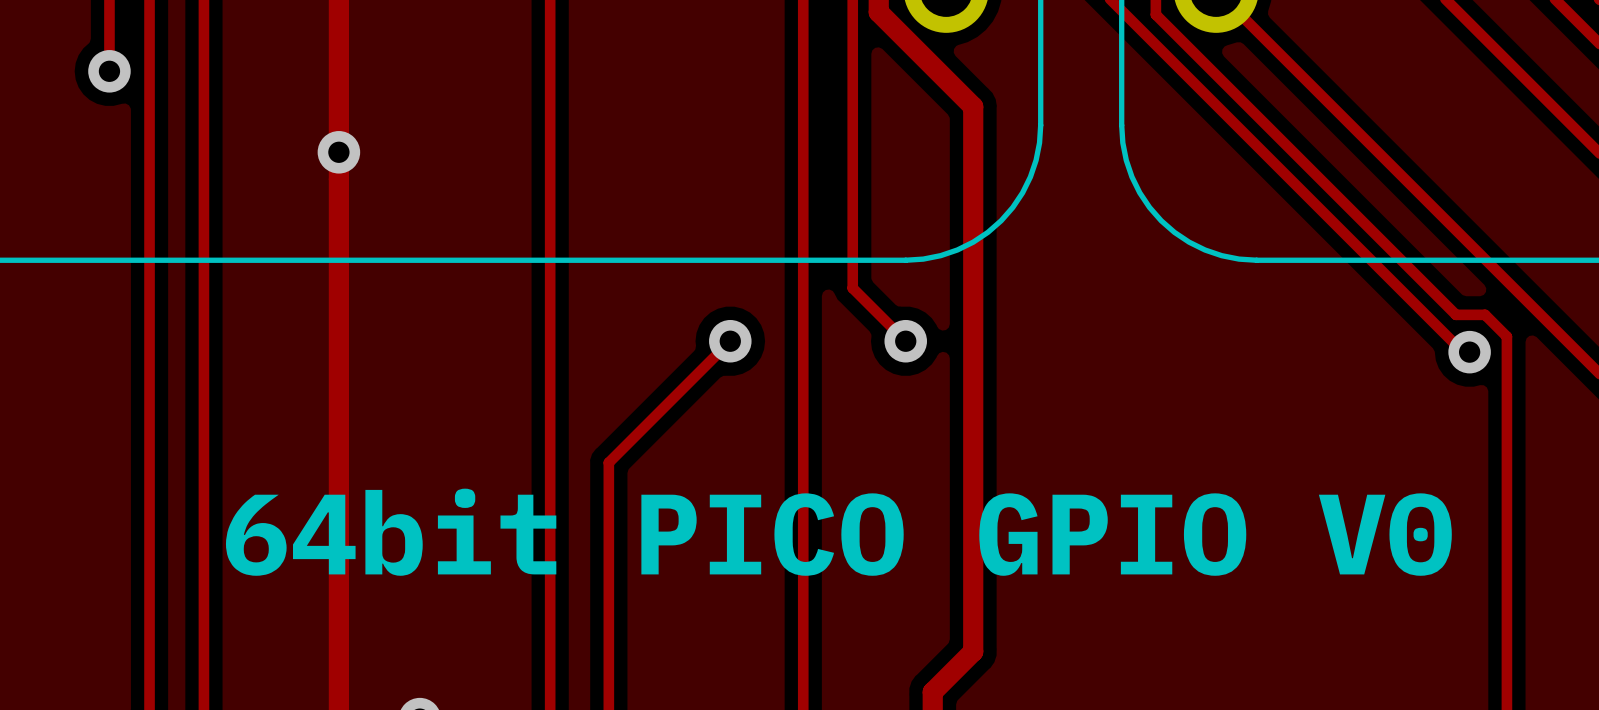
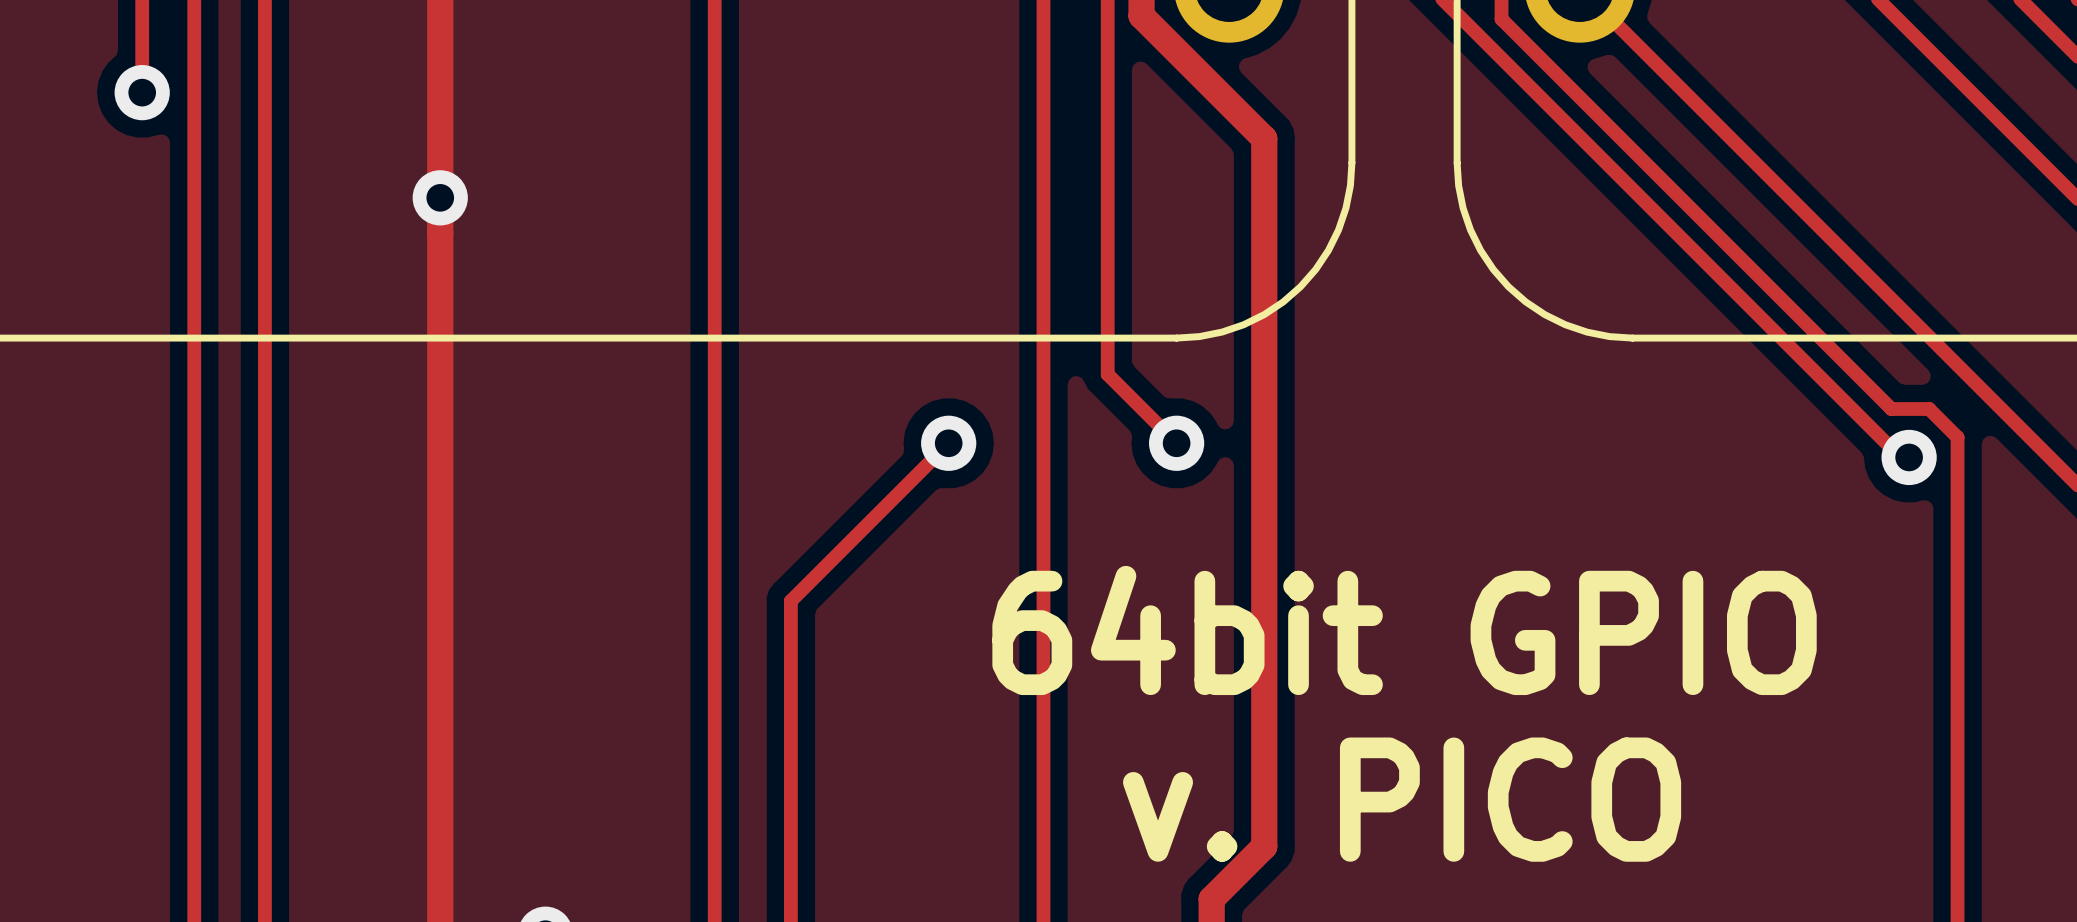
text: 64bit PICO GPIO V0 (838, 532) -> 64bit GPIO (1404, 630)
text: none -> v. PICO (1402, 799)

